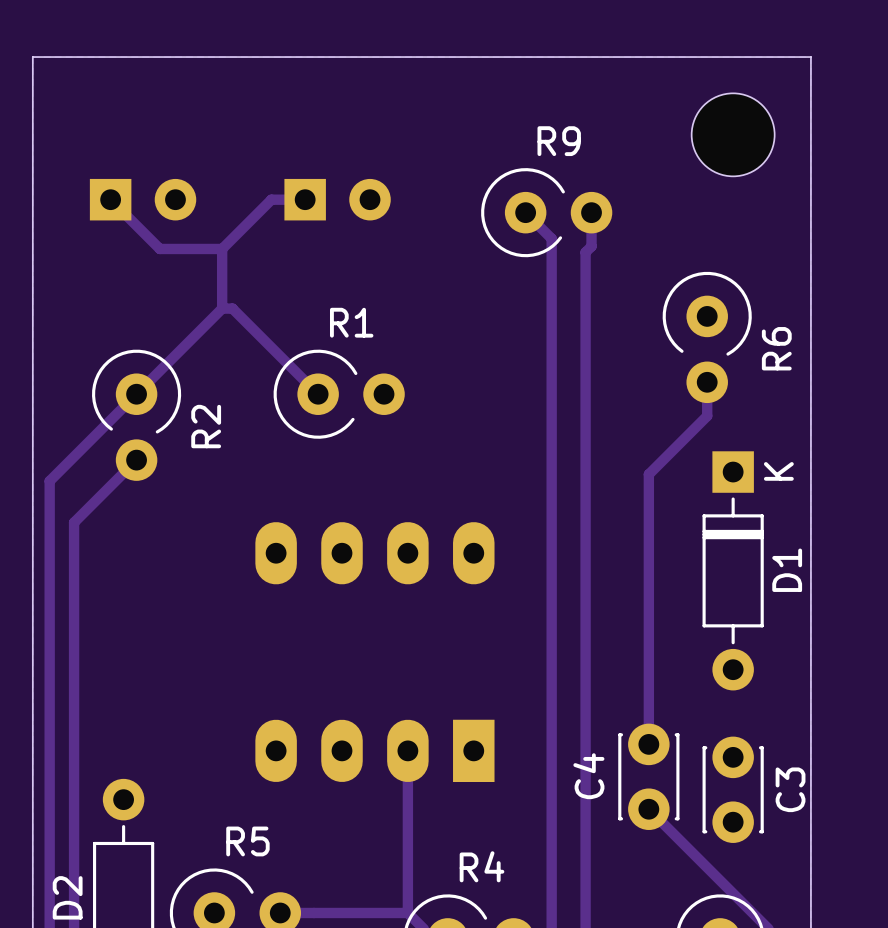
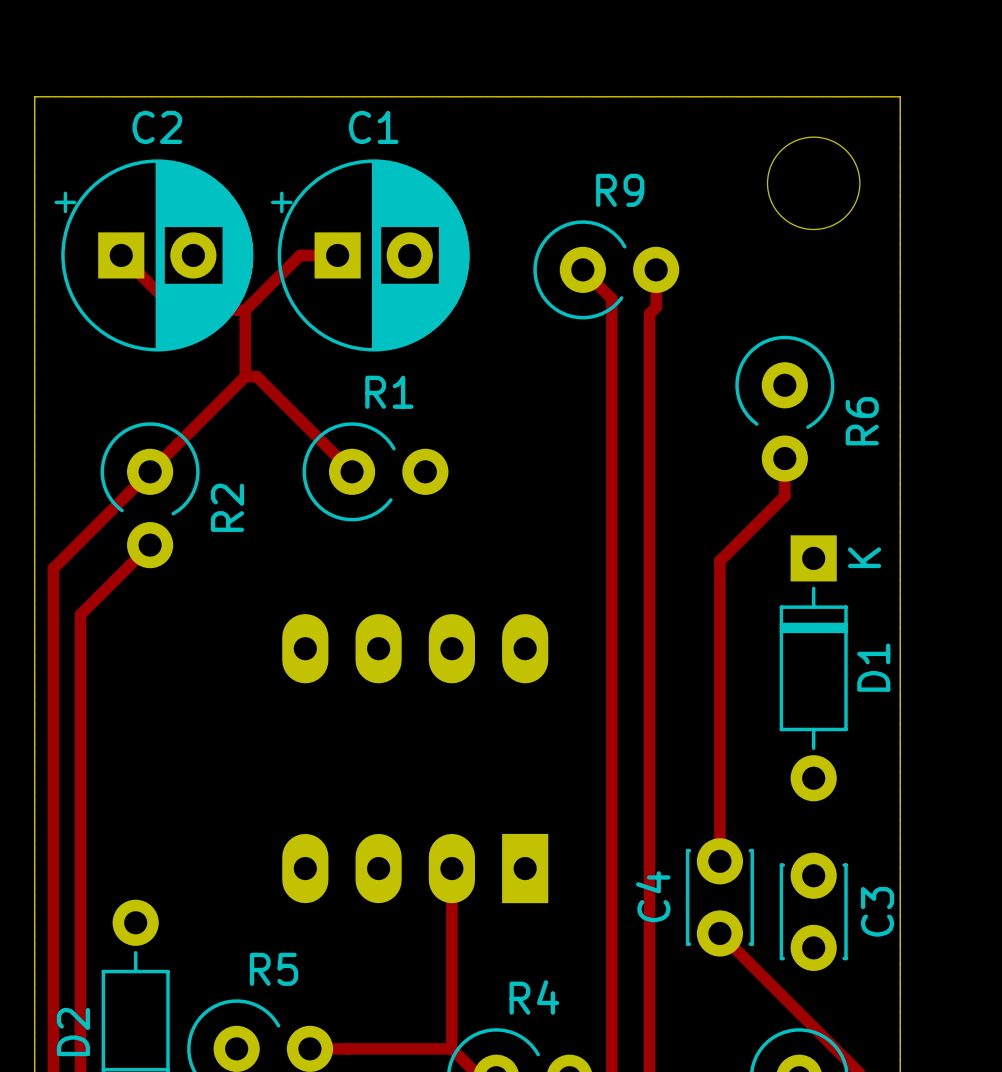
C2 side: bottom (143, 199) -> top (154, 255)
C1 side: bottom (337, 199) -> top (370, 255)

